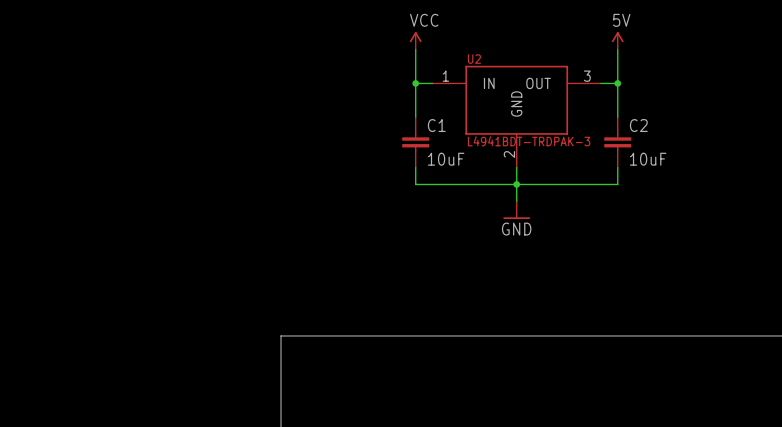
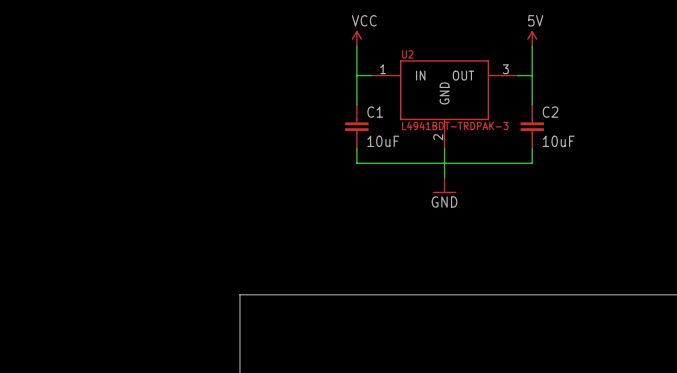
junction: (415, 83) -> none
junction: (617, 83) -> none
junction: (516, 184) -> none

